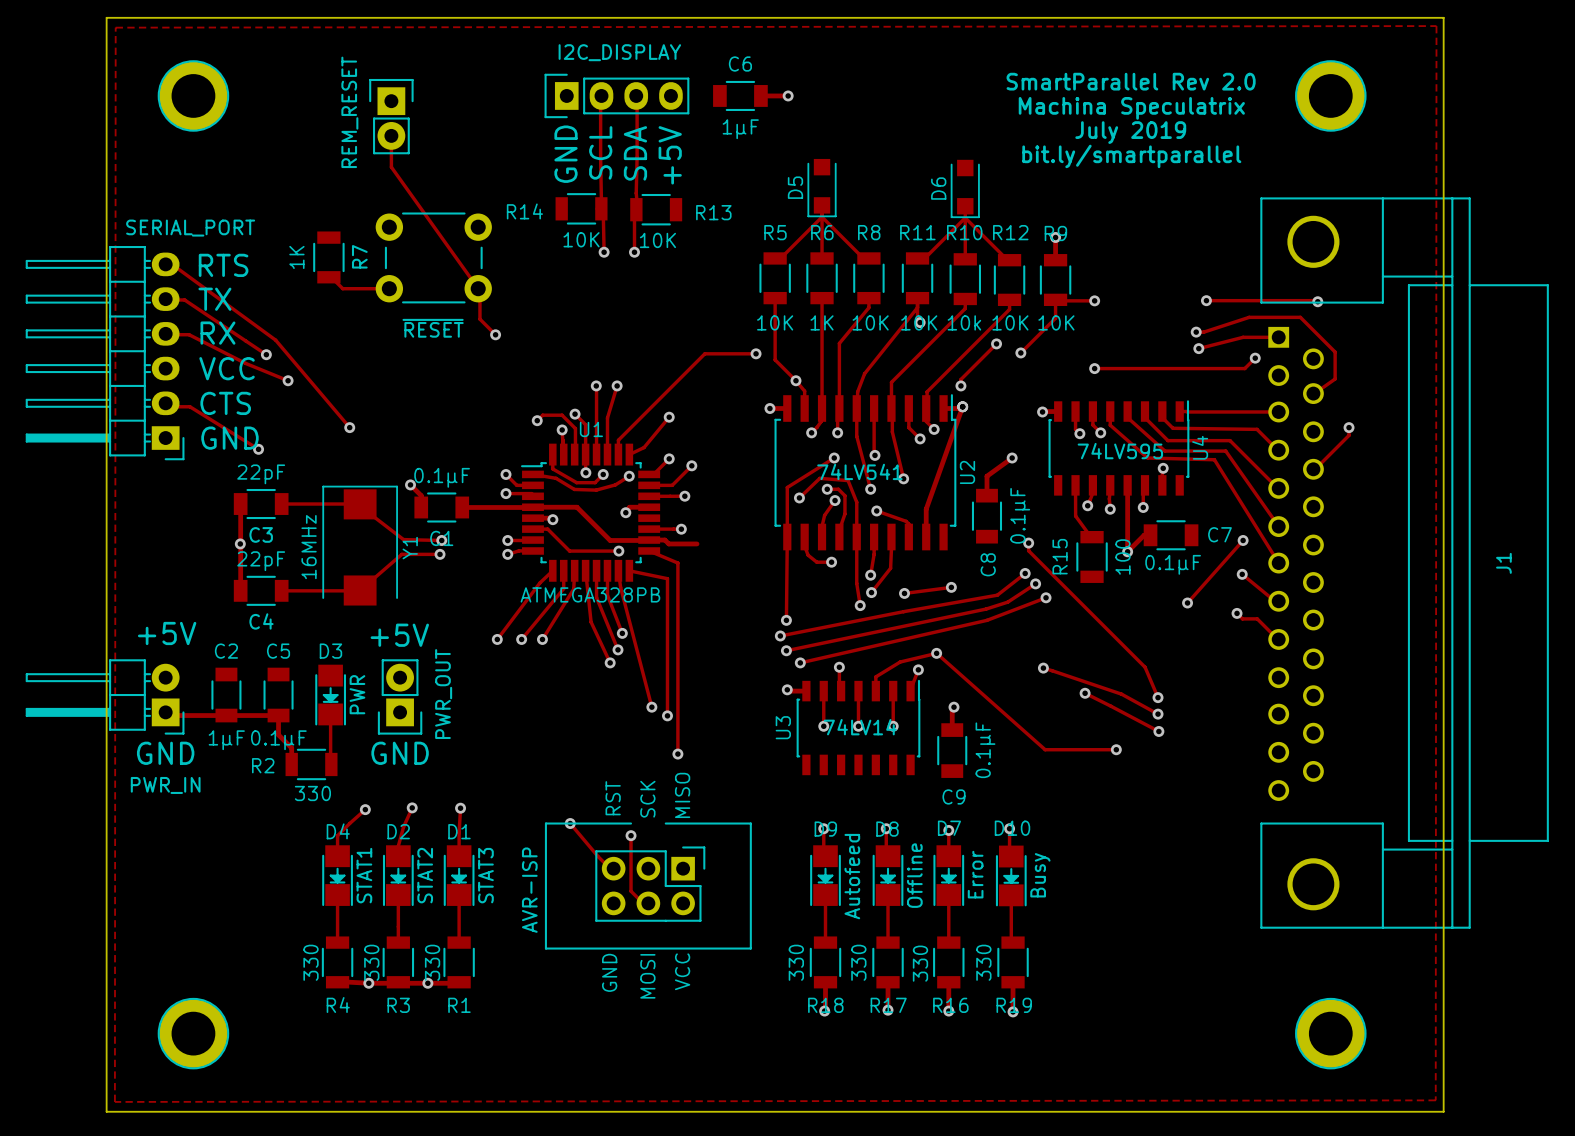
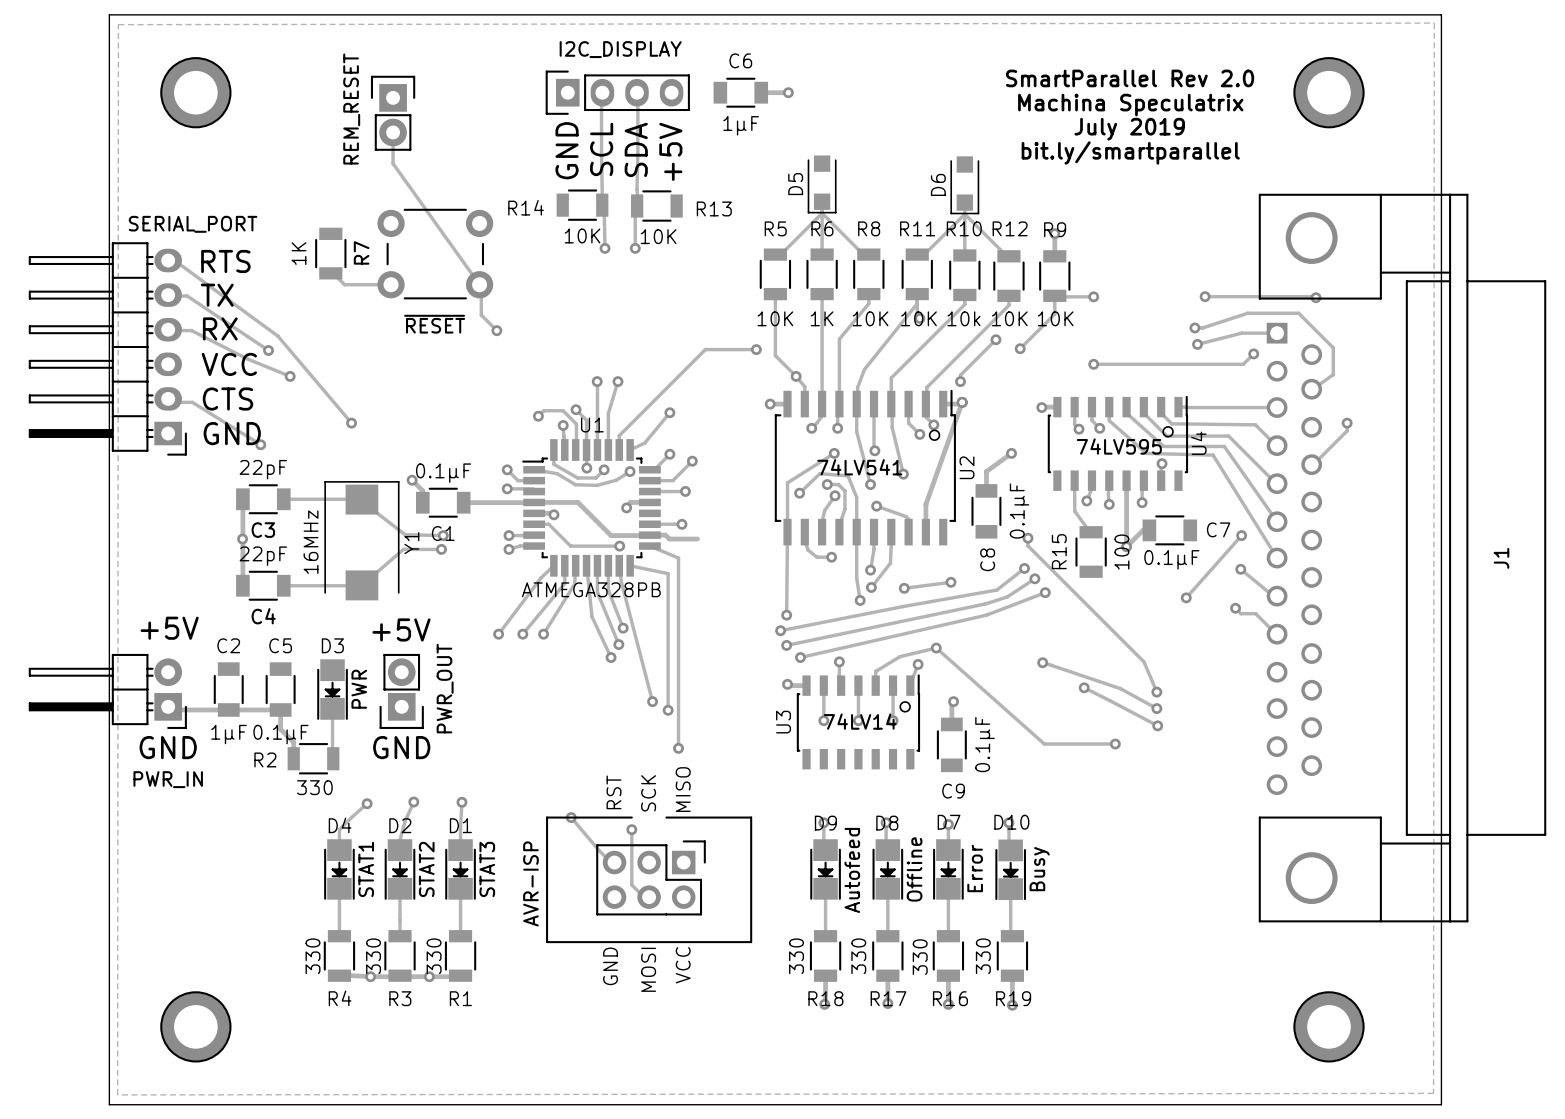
drawing: none -> [1162, 426, 1174, 438]
drawing: none -> [928, 429, 941, 441]
drawing: none -> [899, 701, 911, 713]

